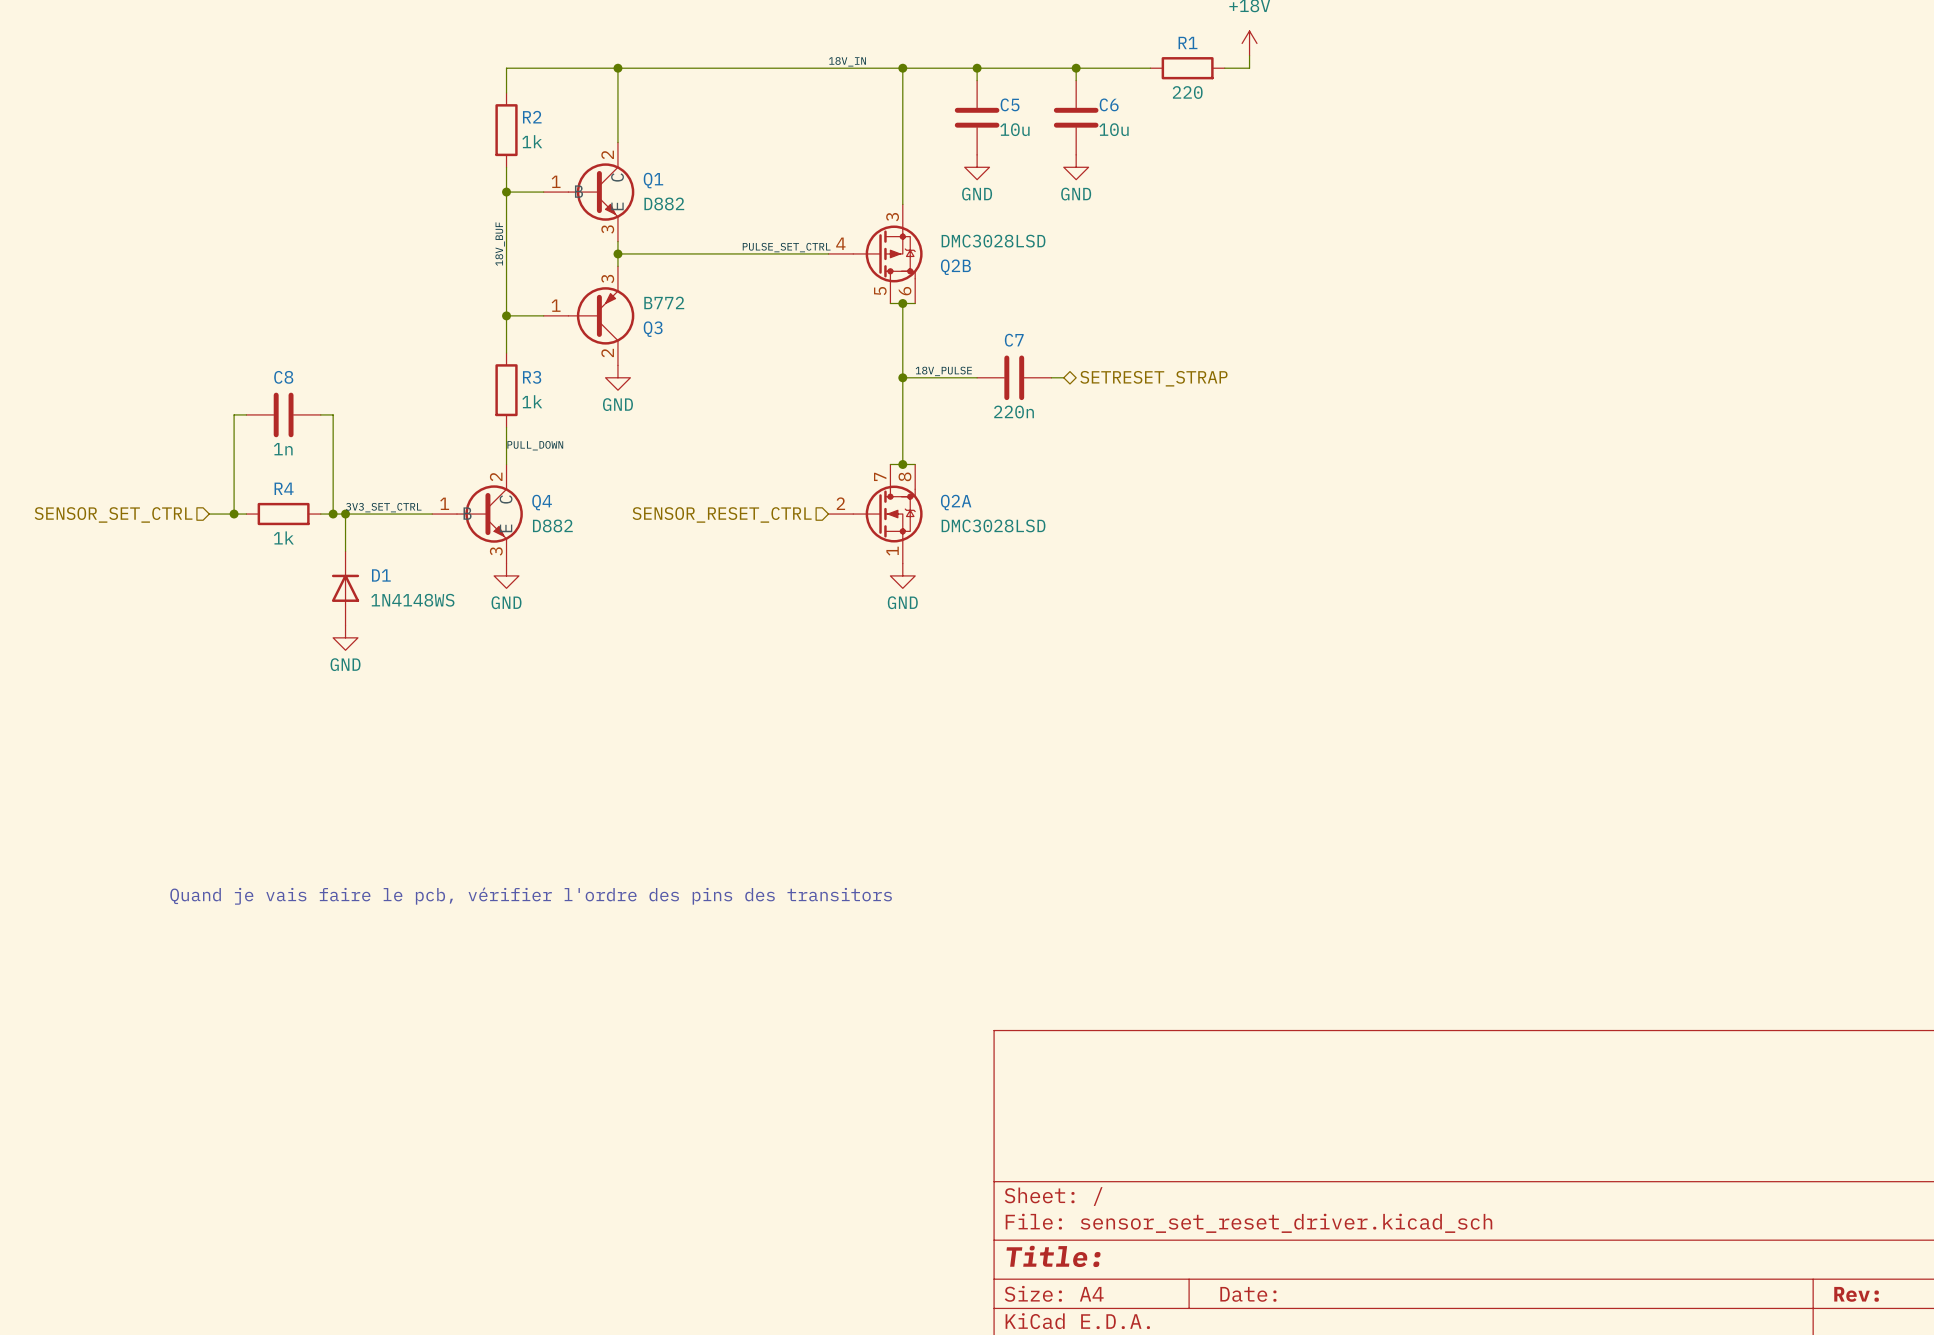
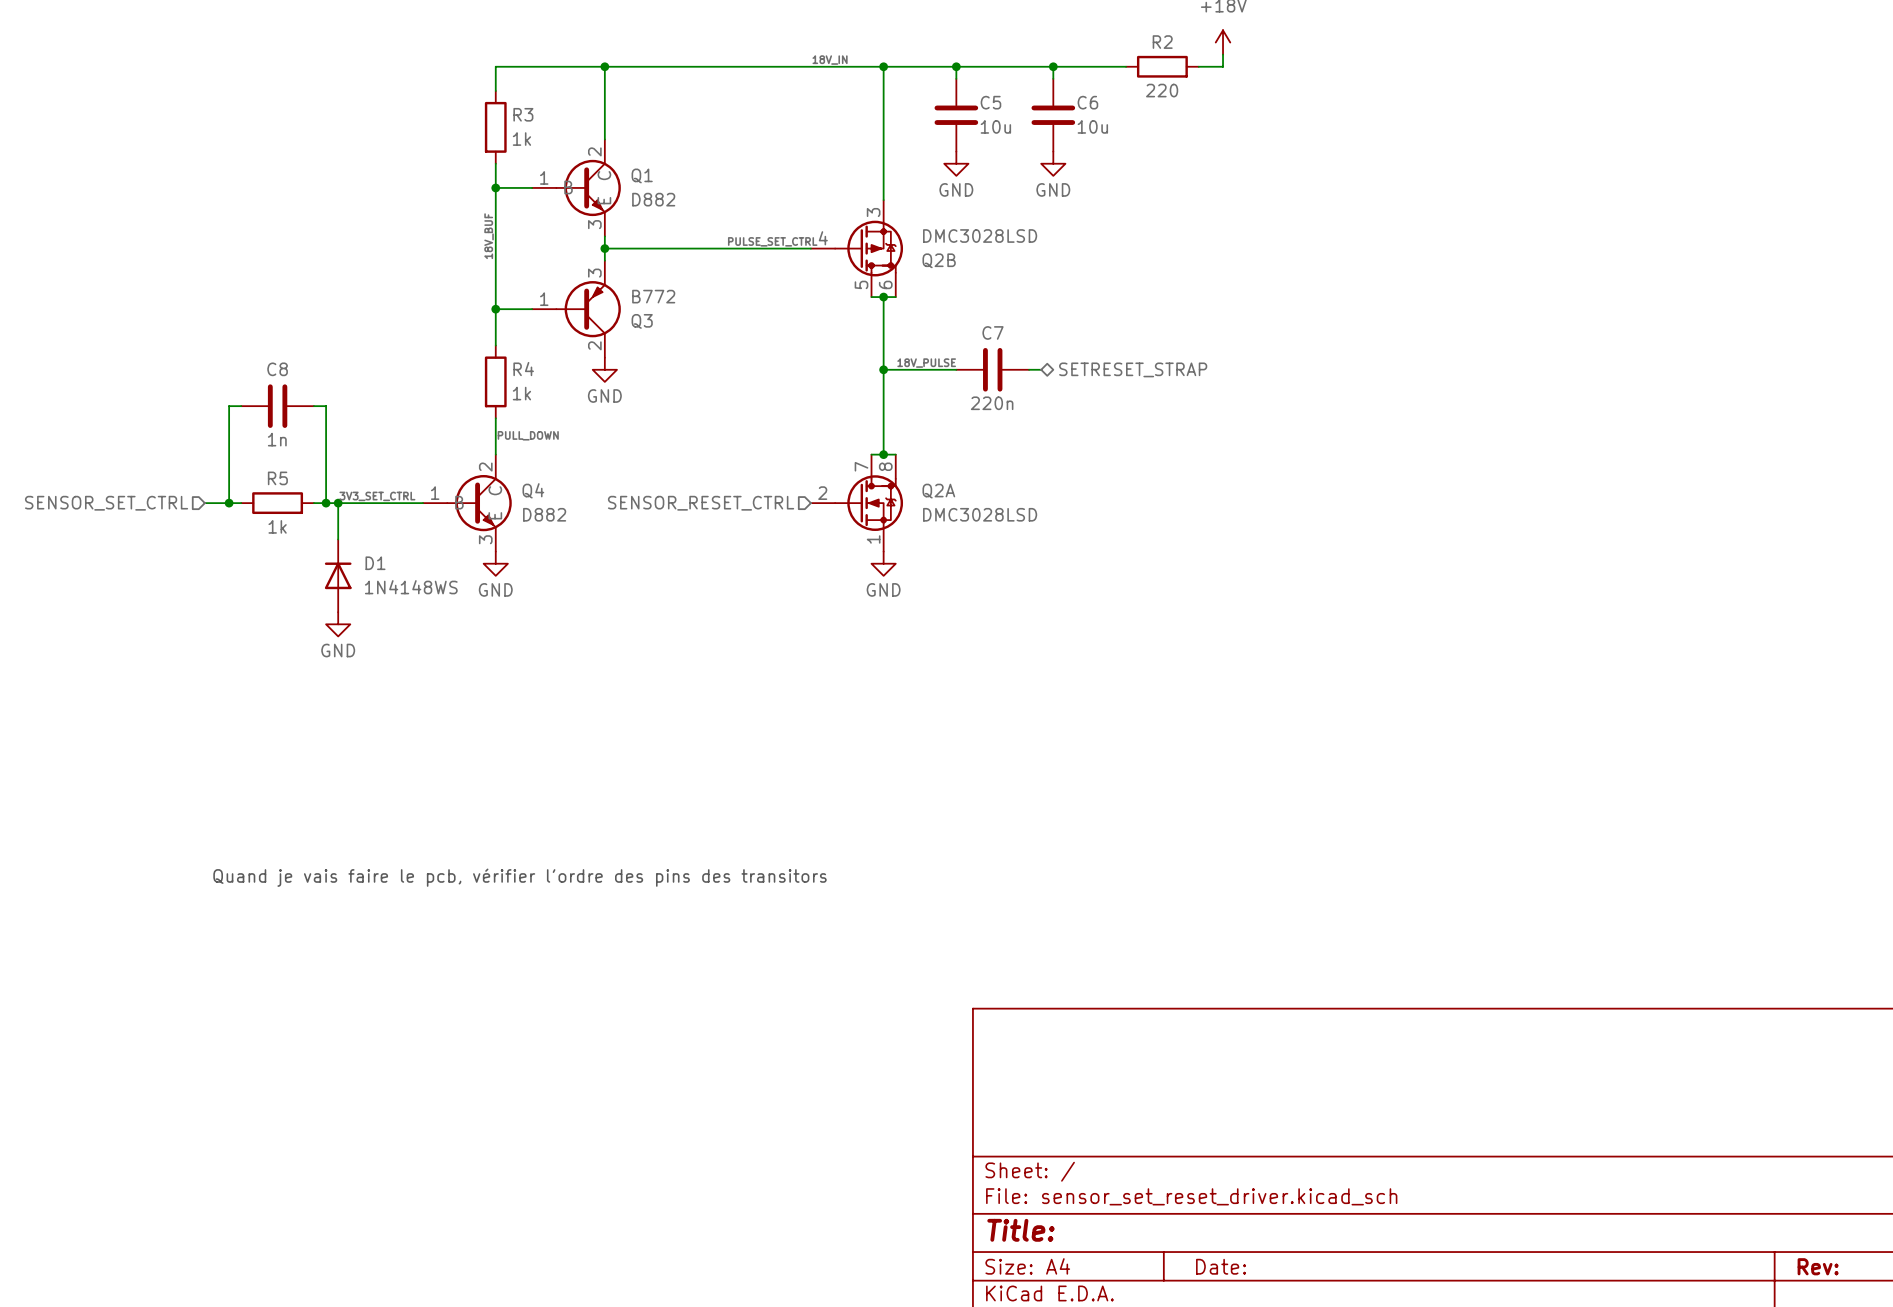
R1 name: R1 (1188, 42) -> R2 (1162, 42)
R2 name: R2 (532, 117) -> R3 (523, 114)
R3 name: R3 (532, 377) -> R4 (523, 369)
R4 name: R4 (284, 488) -> R5 (277, 478)

